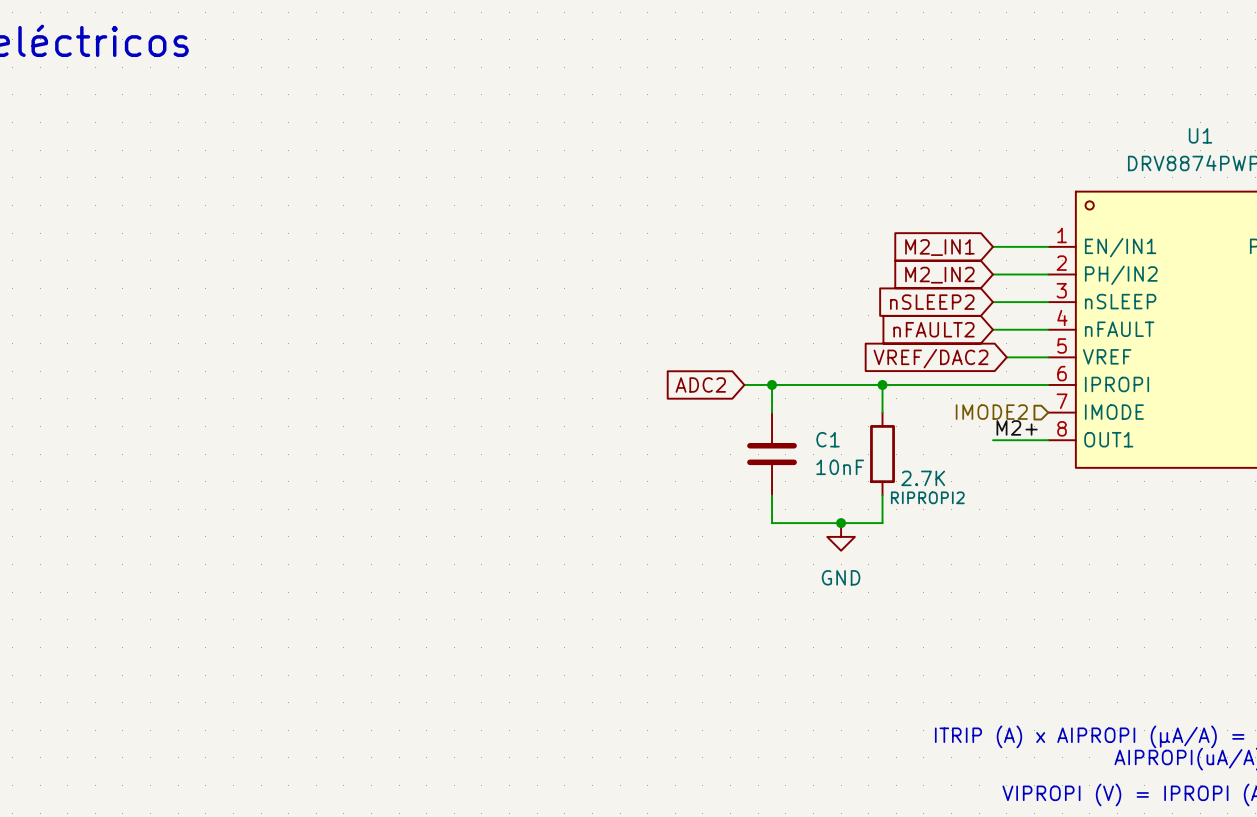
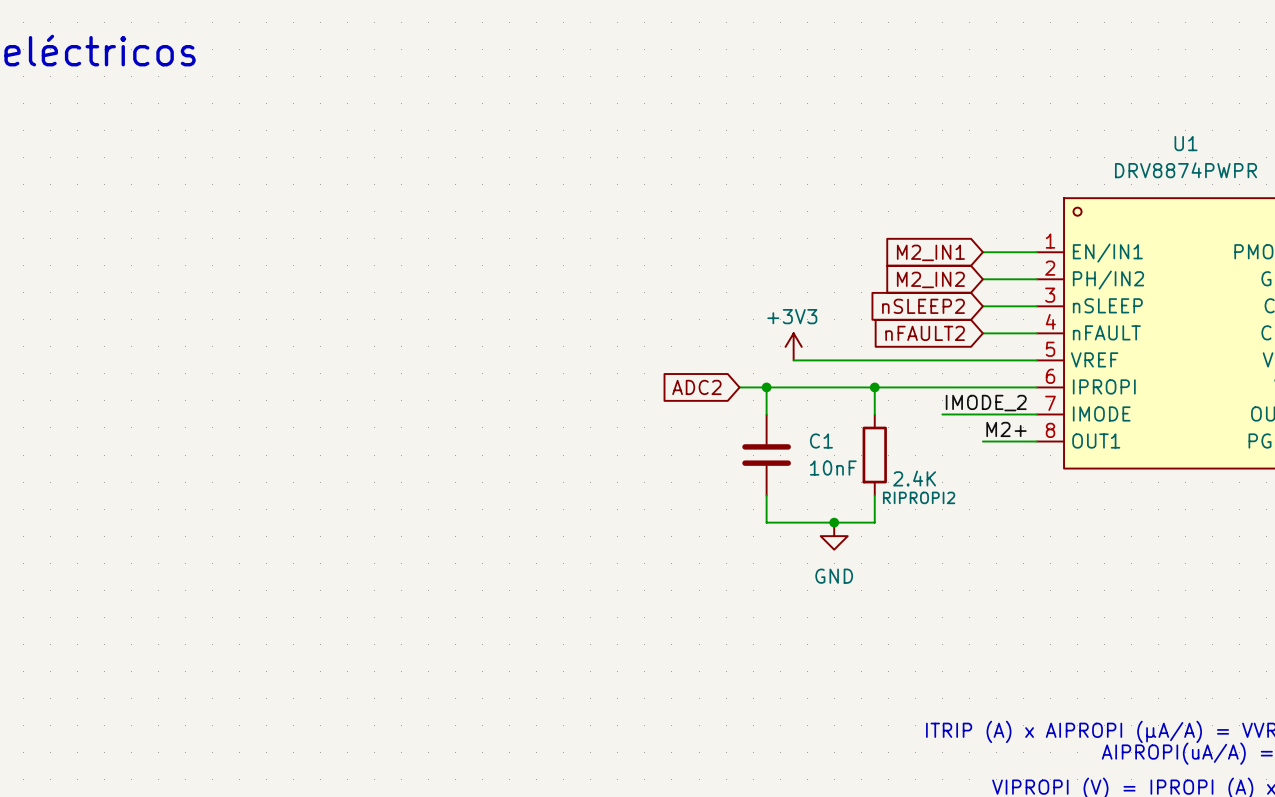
power symbol: none -> +3V3 (793, 346)
wire: none -> (793, 360) (996, 360)
global label: VREF/DAC2 (930, 358) -> none
label: none -> IMODE_2 (986, 403)
wire: none -> (942, 414) (1036, 414)
hierarchical label: IMODE2 (991, 412) -> none
RIPROPI2 value: 2.7K (923, 478) -> 2.4K (914, 478)

